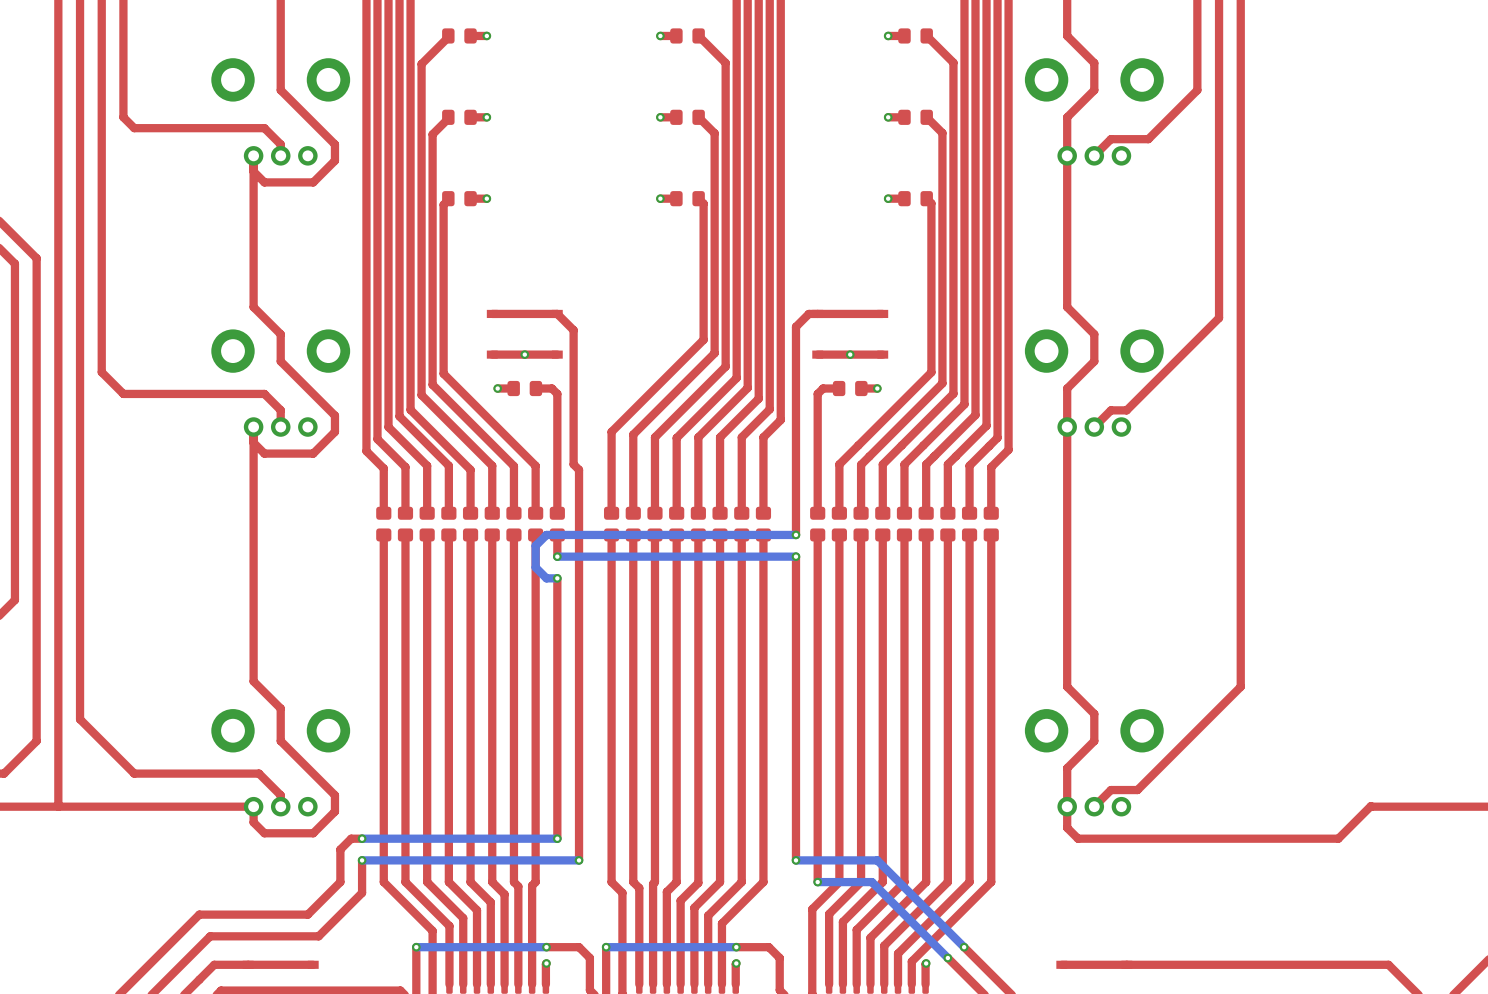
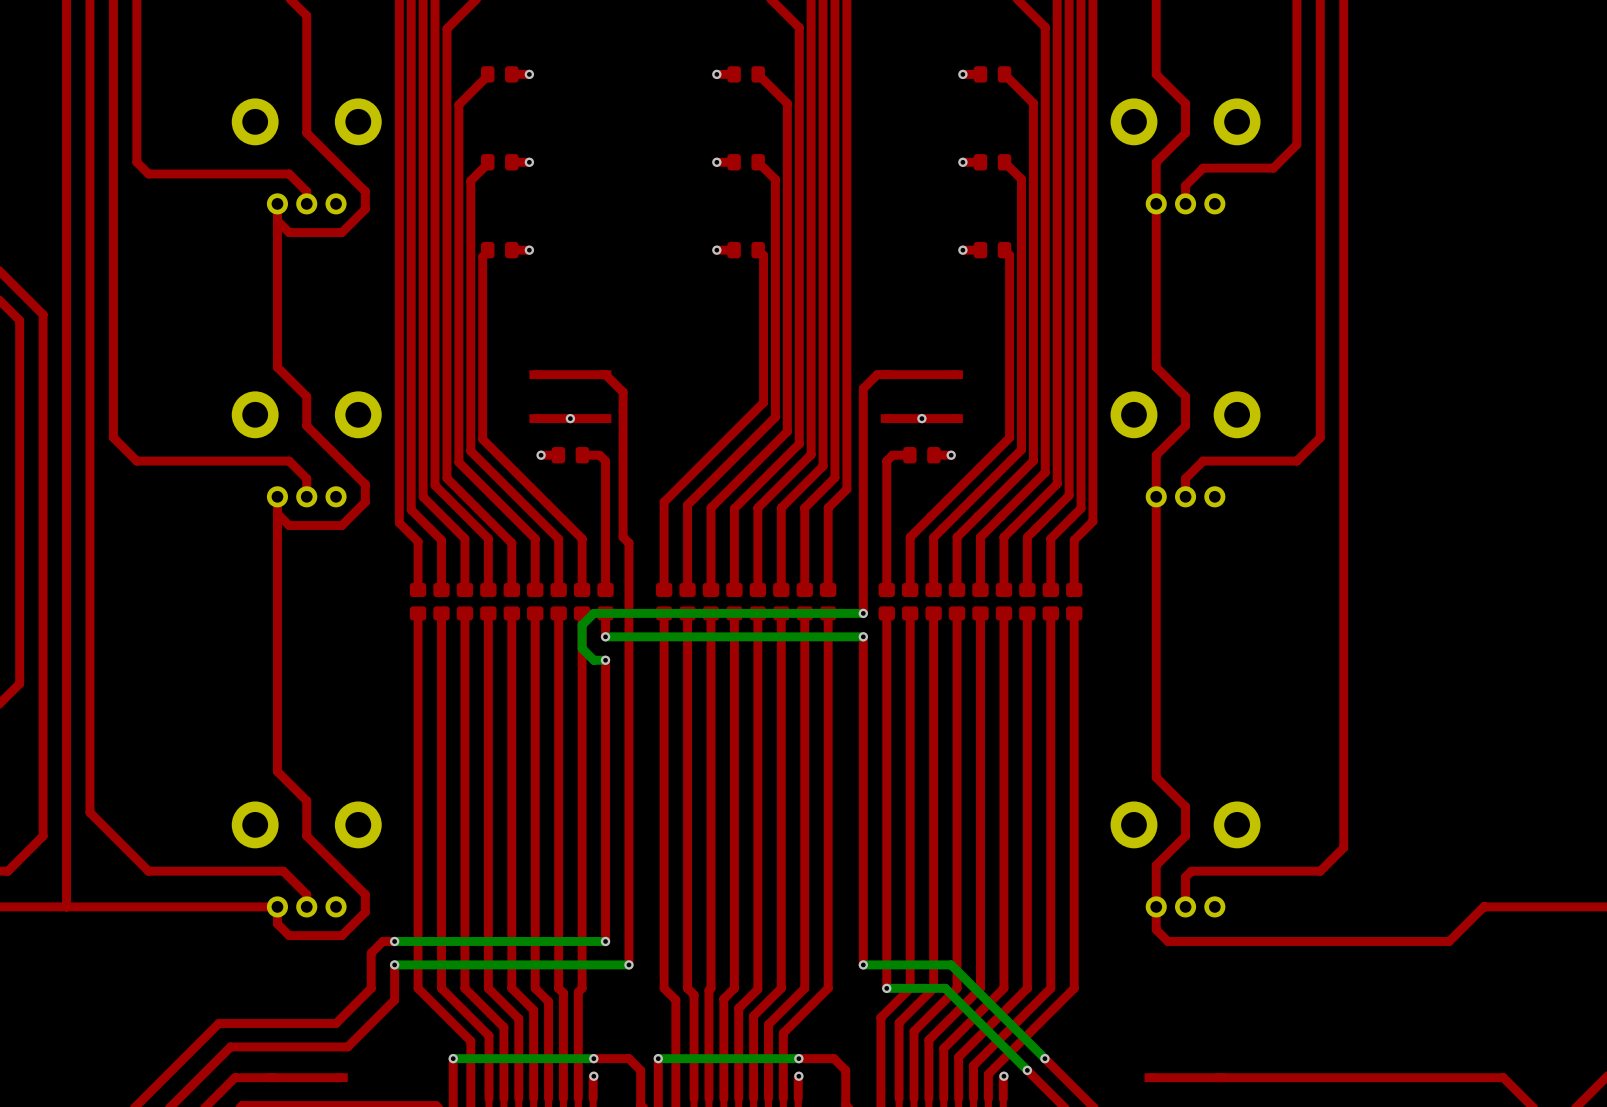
top track: (1197, 90) (1148, 139) (1110, 139) (1094, 155) -> (1296, 132) (1296, 144) (1273, 168) (1203, 168) (1185, 185) (1185, 203)
top track: (1219, 318) (1126, 410) (1110, 410) (1094, 427) -> (1320, 379) (1320, 437) (1296, 461) (1203, 461) (1185, 478) (1185, 496)
top track: (1240, 686) (1137, 790) (1110, 790) (1094, 806) -> (1343, 777) (1343, 847) (1320, 871) (1191, 871) (1185, 877) (1185, 906)

